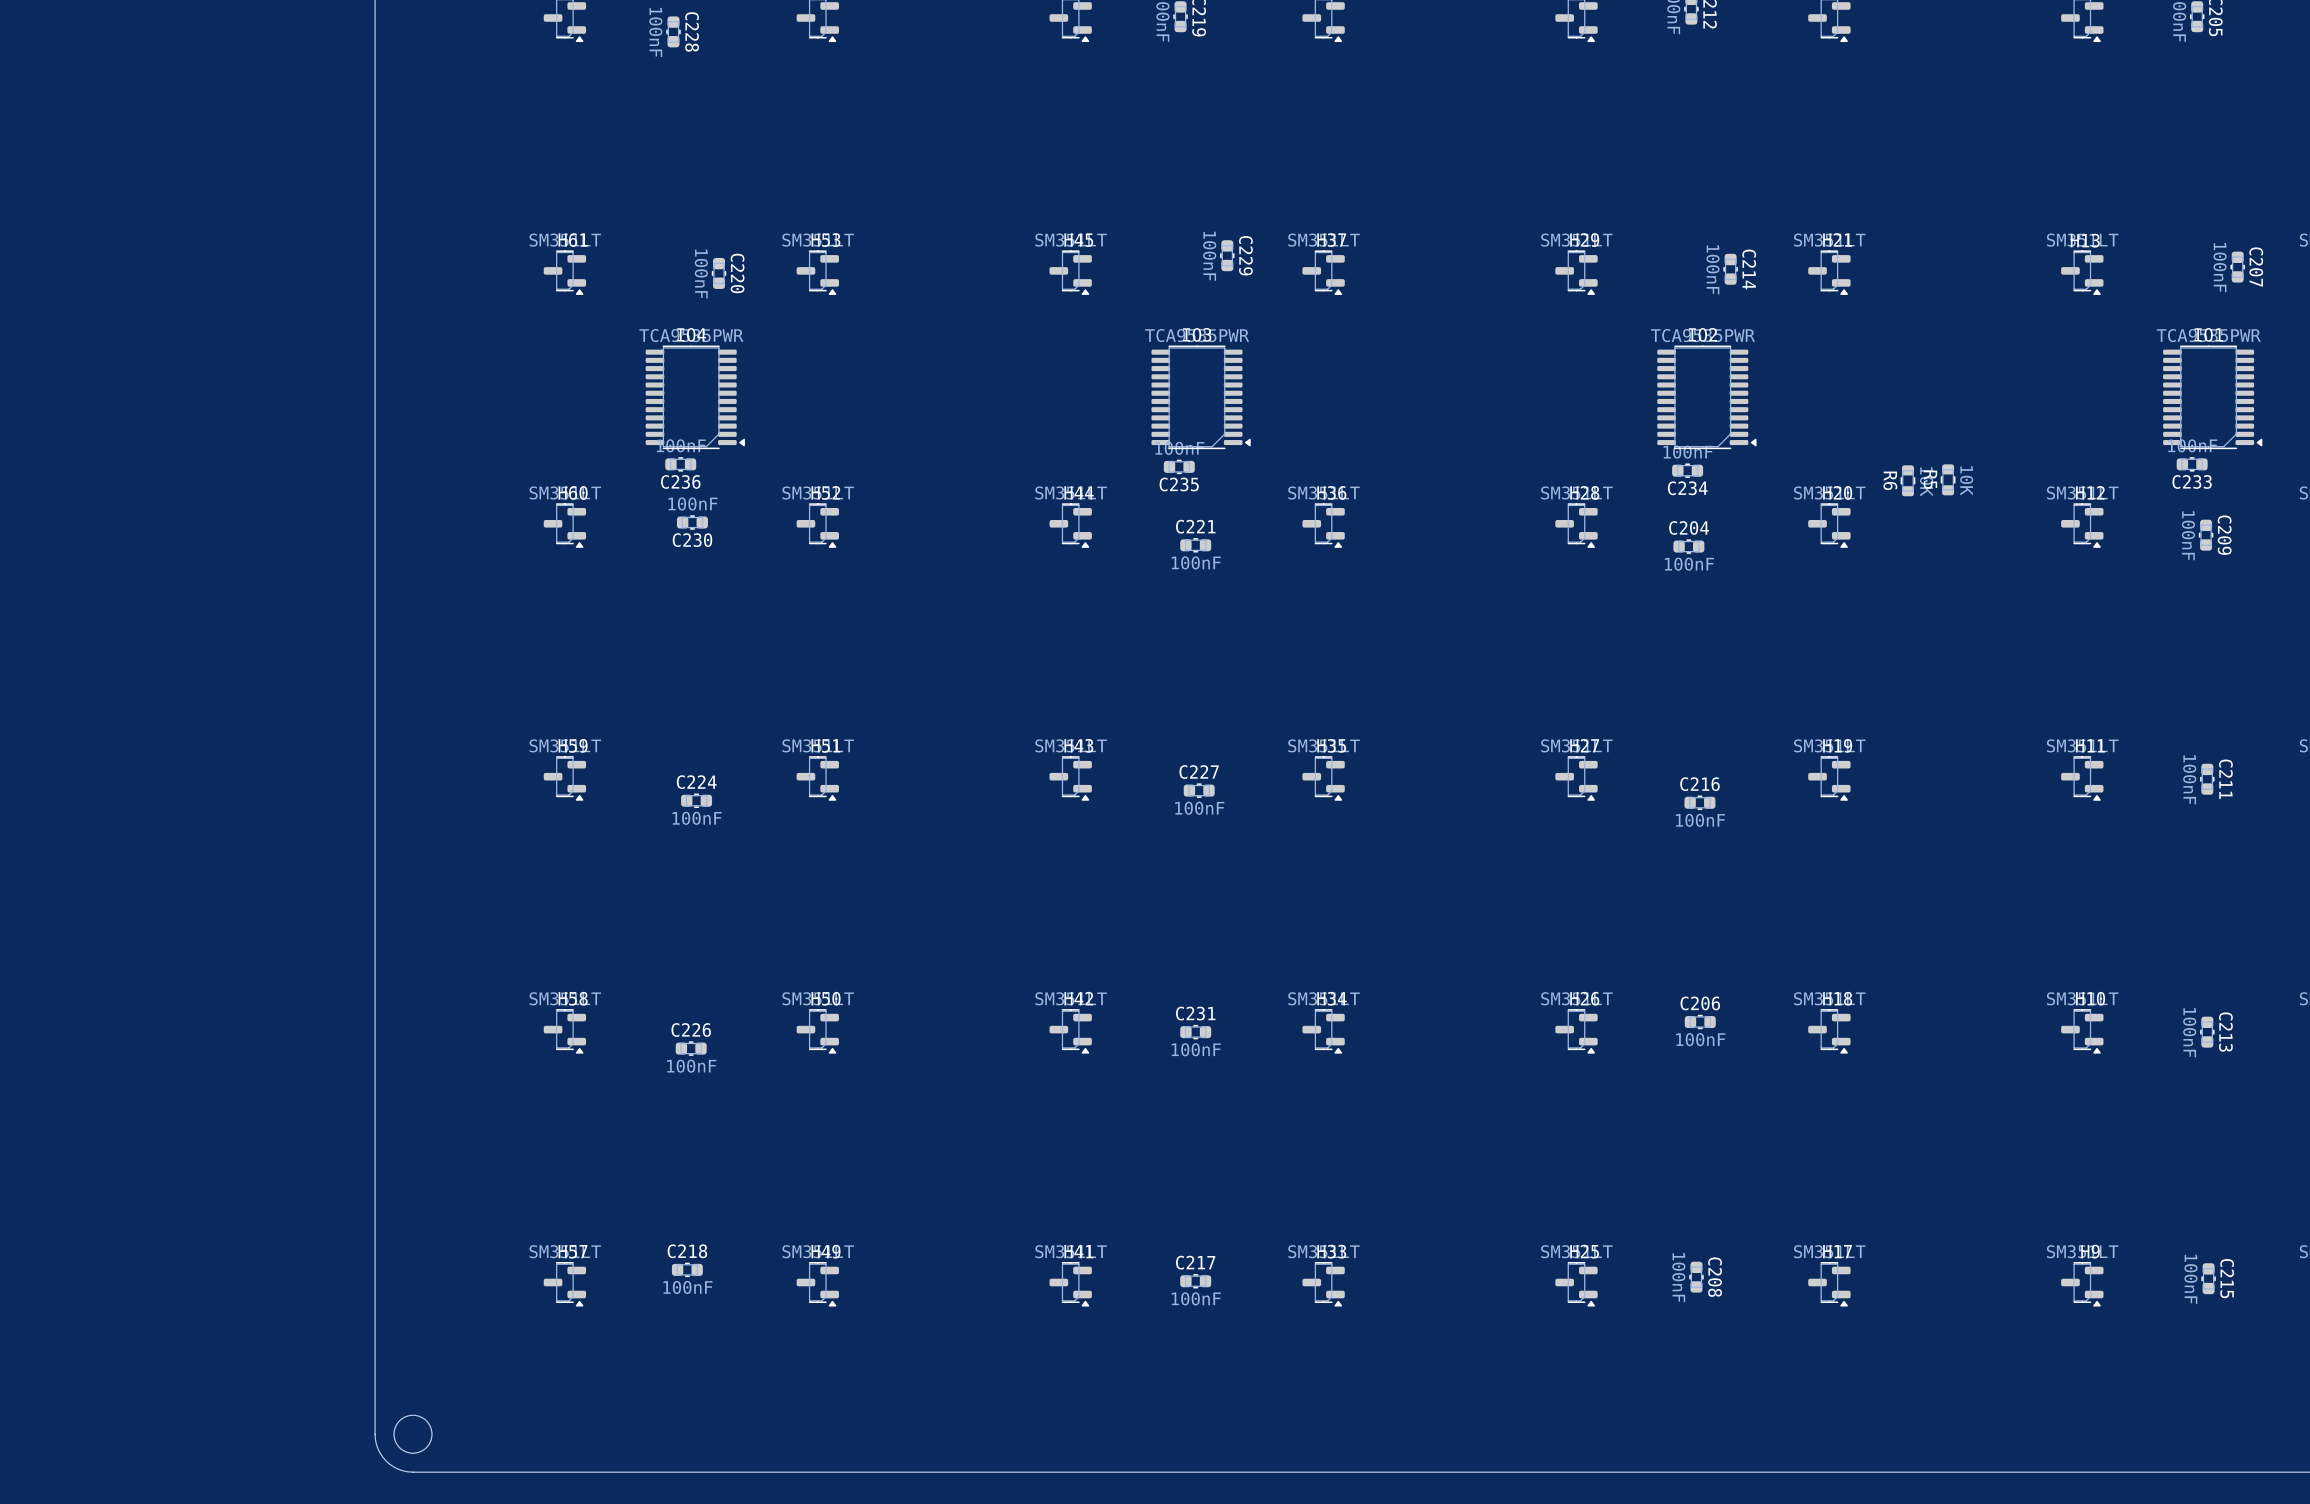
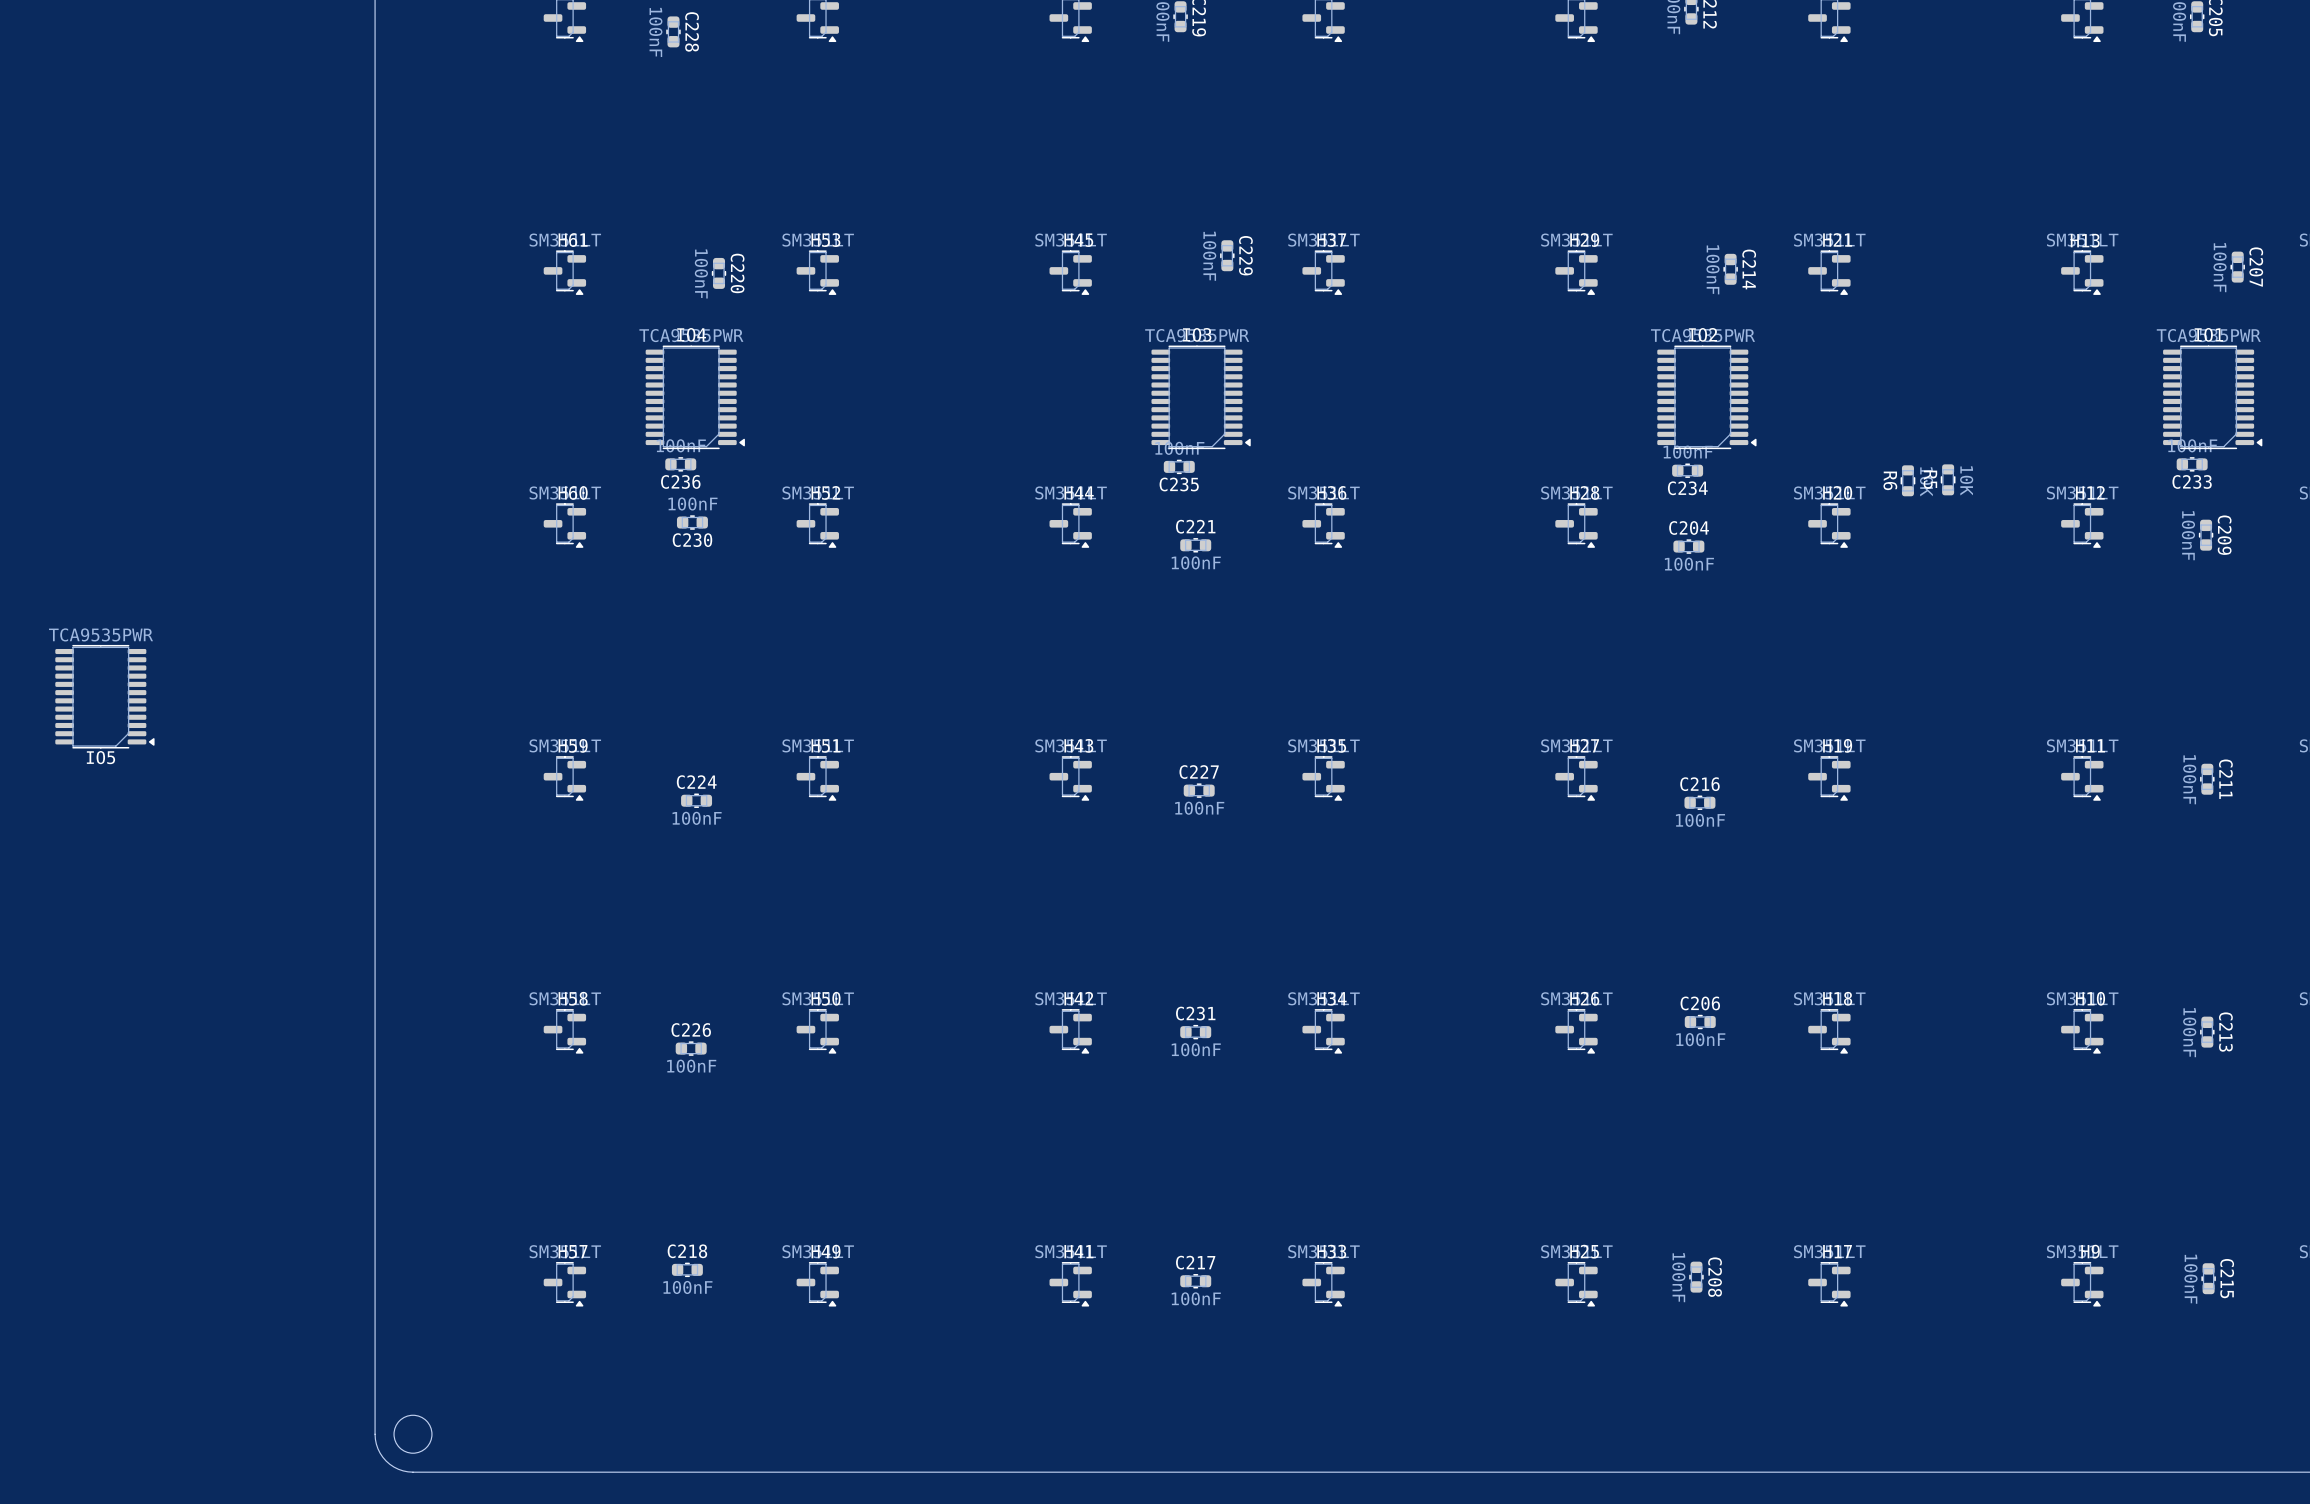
IO5: none -> TCA9535PWR (104, 696)

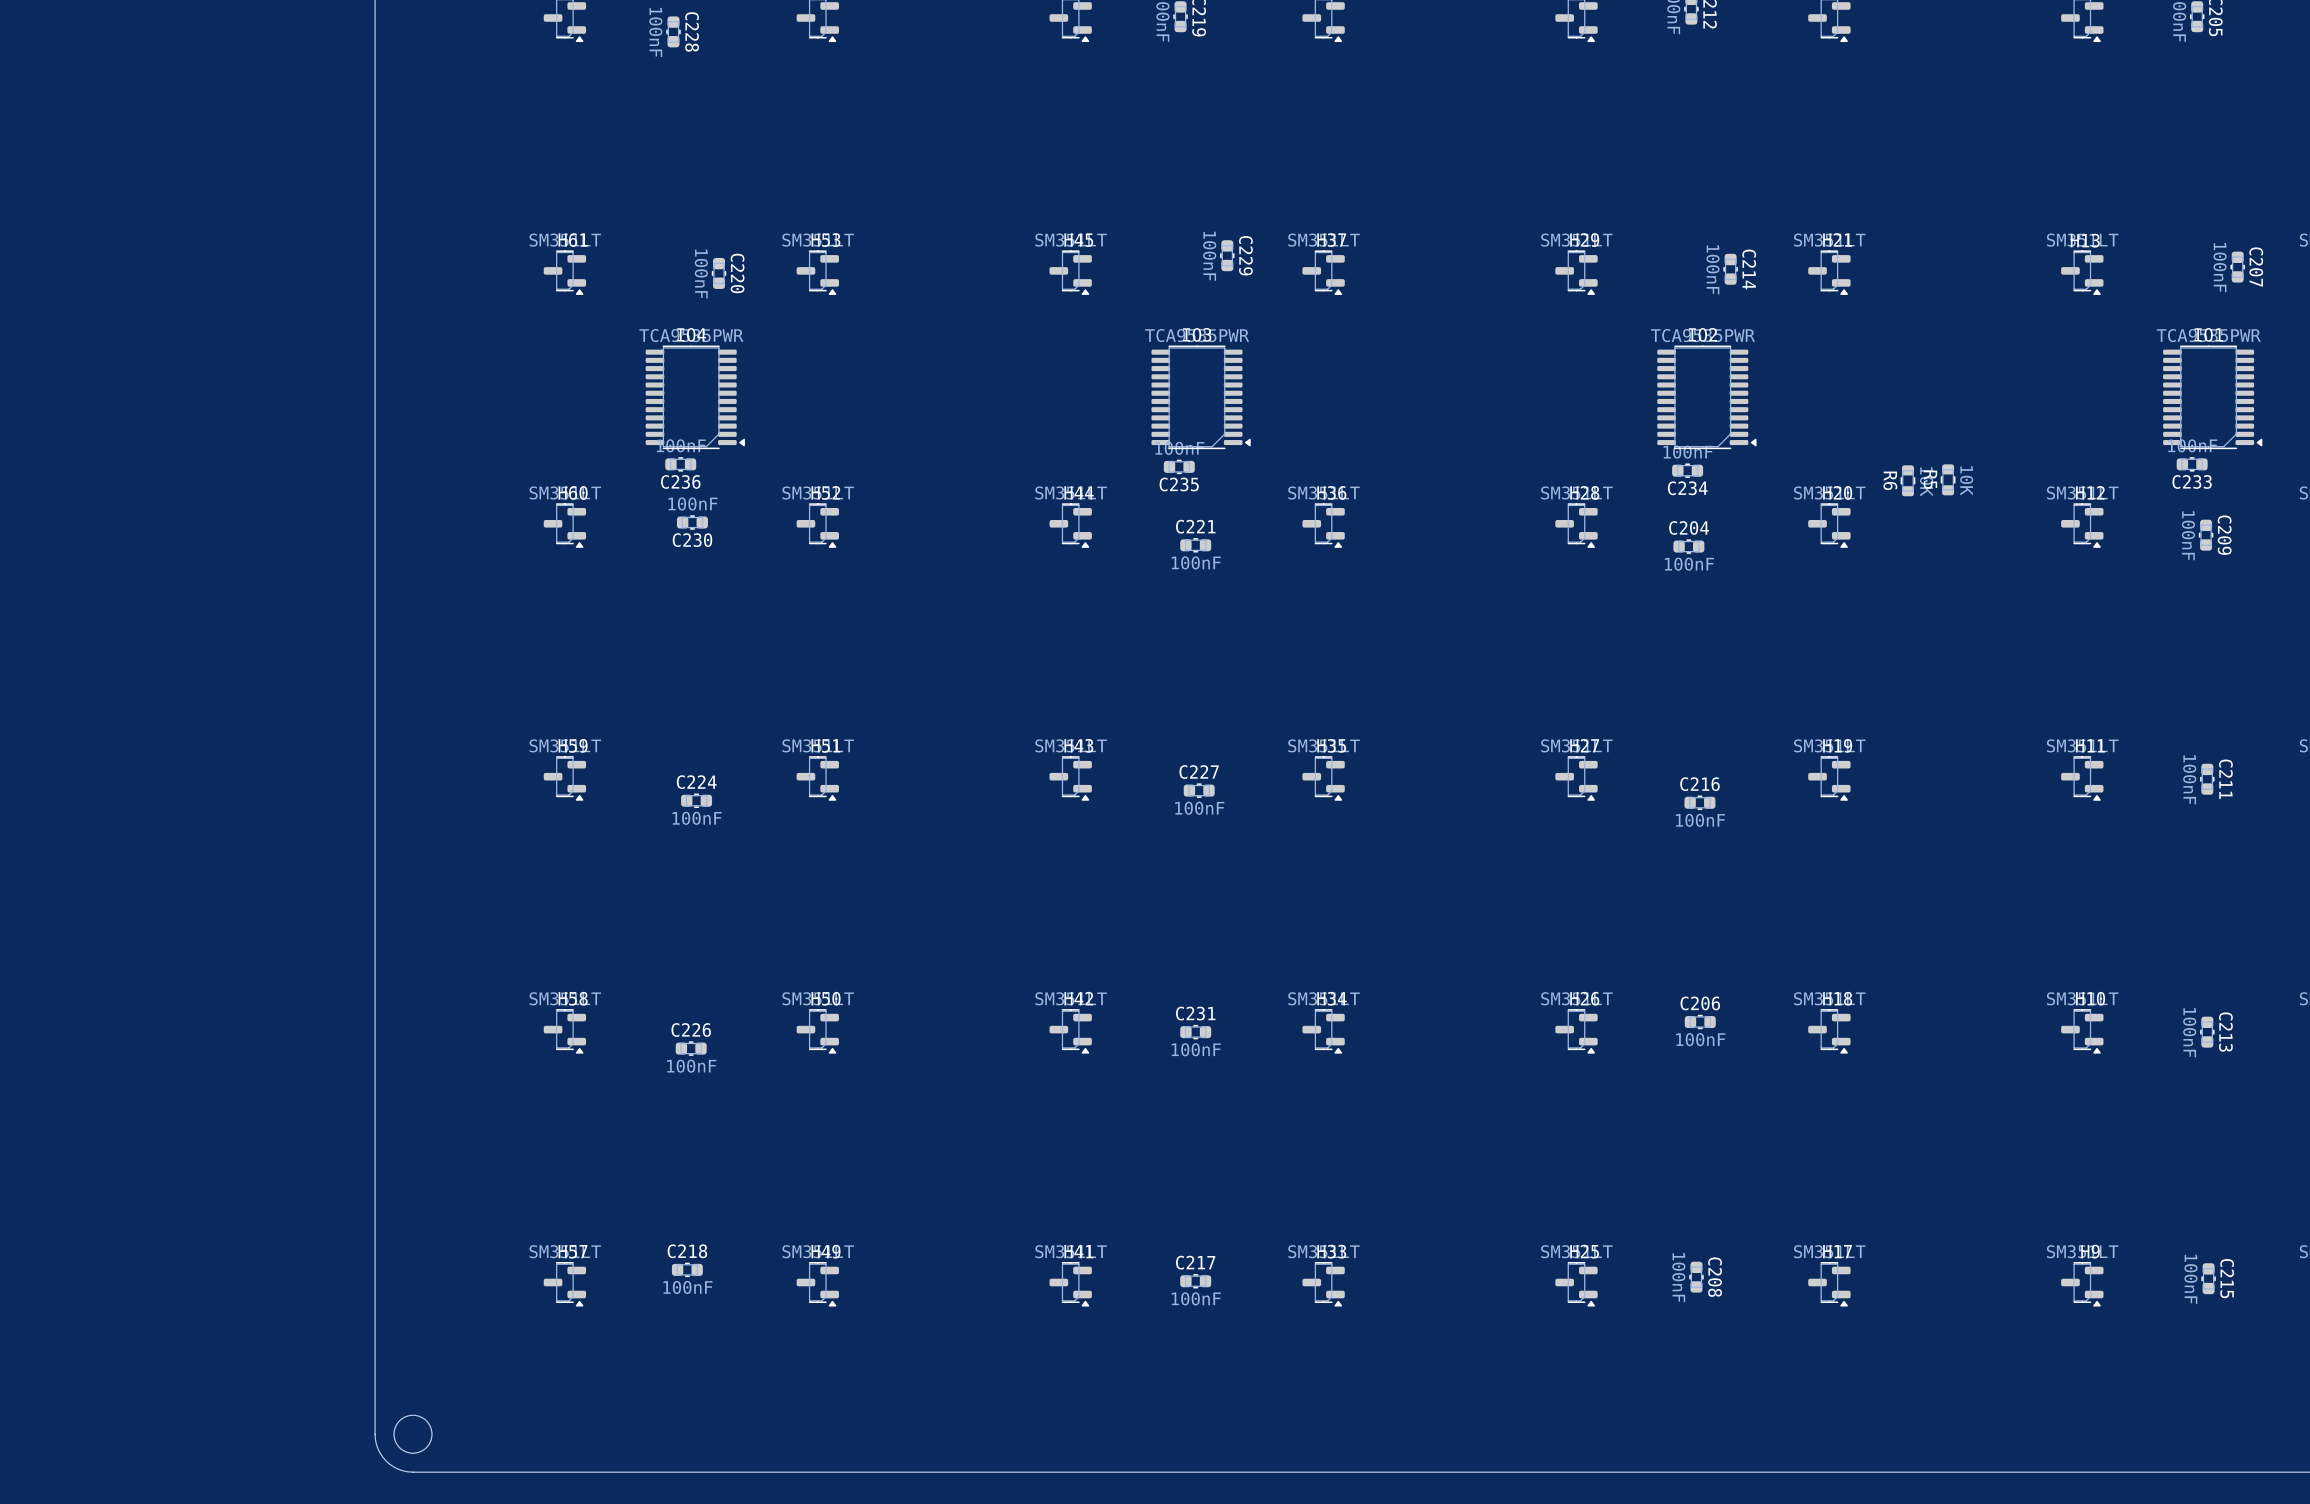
IO5: TCA9535PWR (104, 696) -> none

